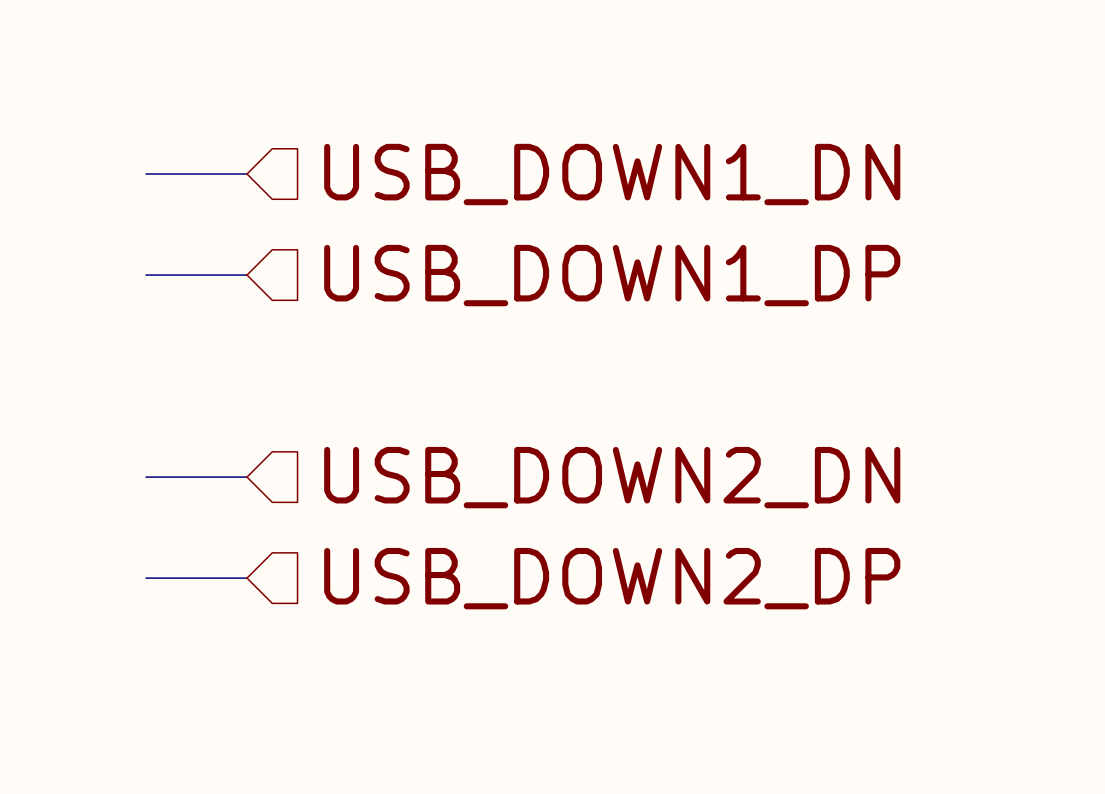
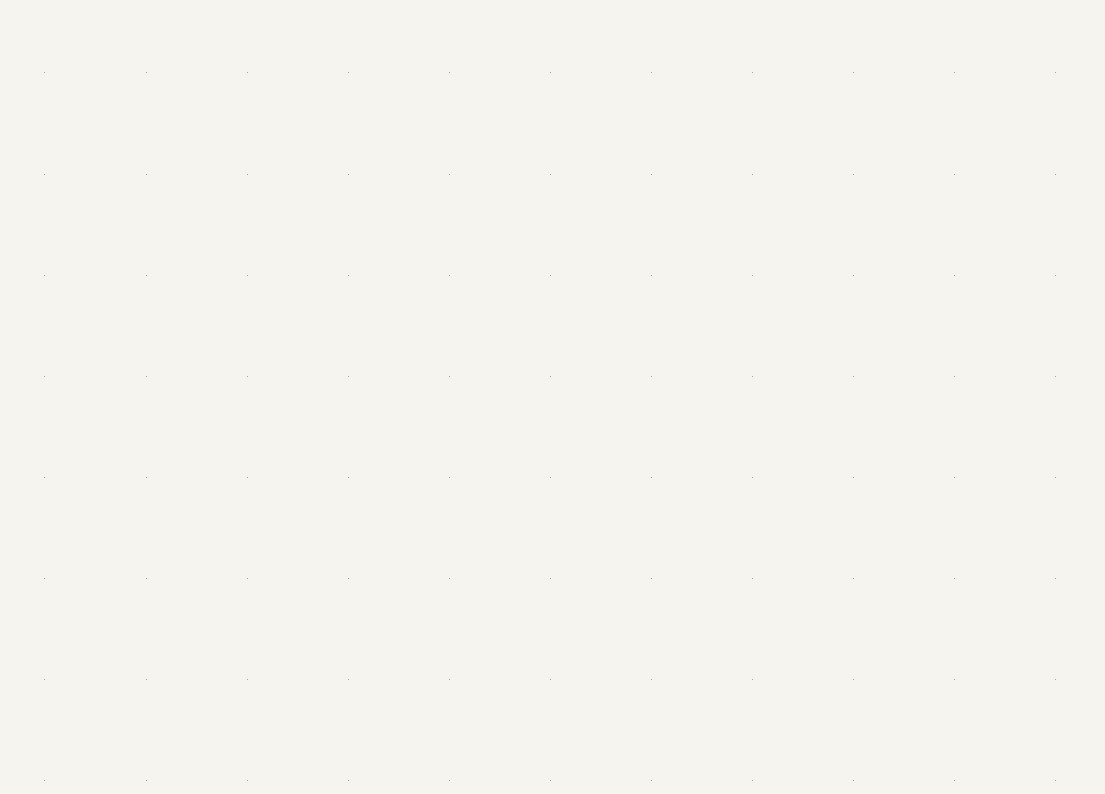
wire: (146, 174) (247, 174) -> none
hierarchical label: USB_DOWN1_DN (612, 174) -> none
wire: (146, 275) (247, 275) -> none
hierarchical label: USB_DOWN1_DP (612, 275) -> none
wire: (146, 477) (247, 477) -> none
hierarchical label: USB_DOWN2_DN (612, 477) -> none
wire: (146, 578) (247, 578) -> none
hierarchical label: USB_DOWN2_DP (612, 578) -> none

